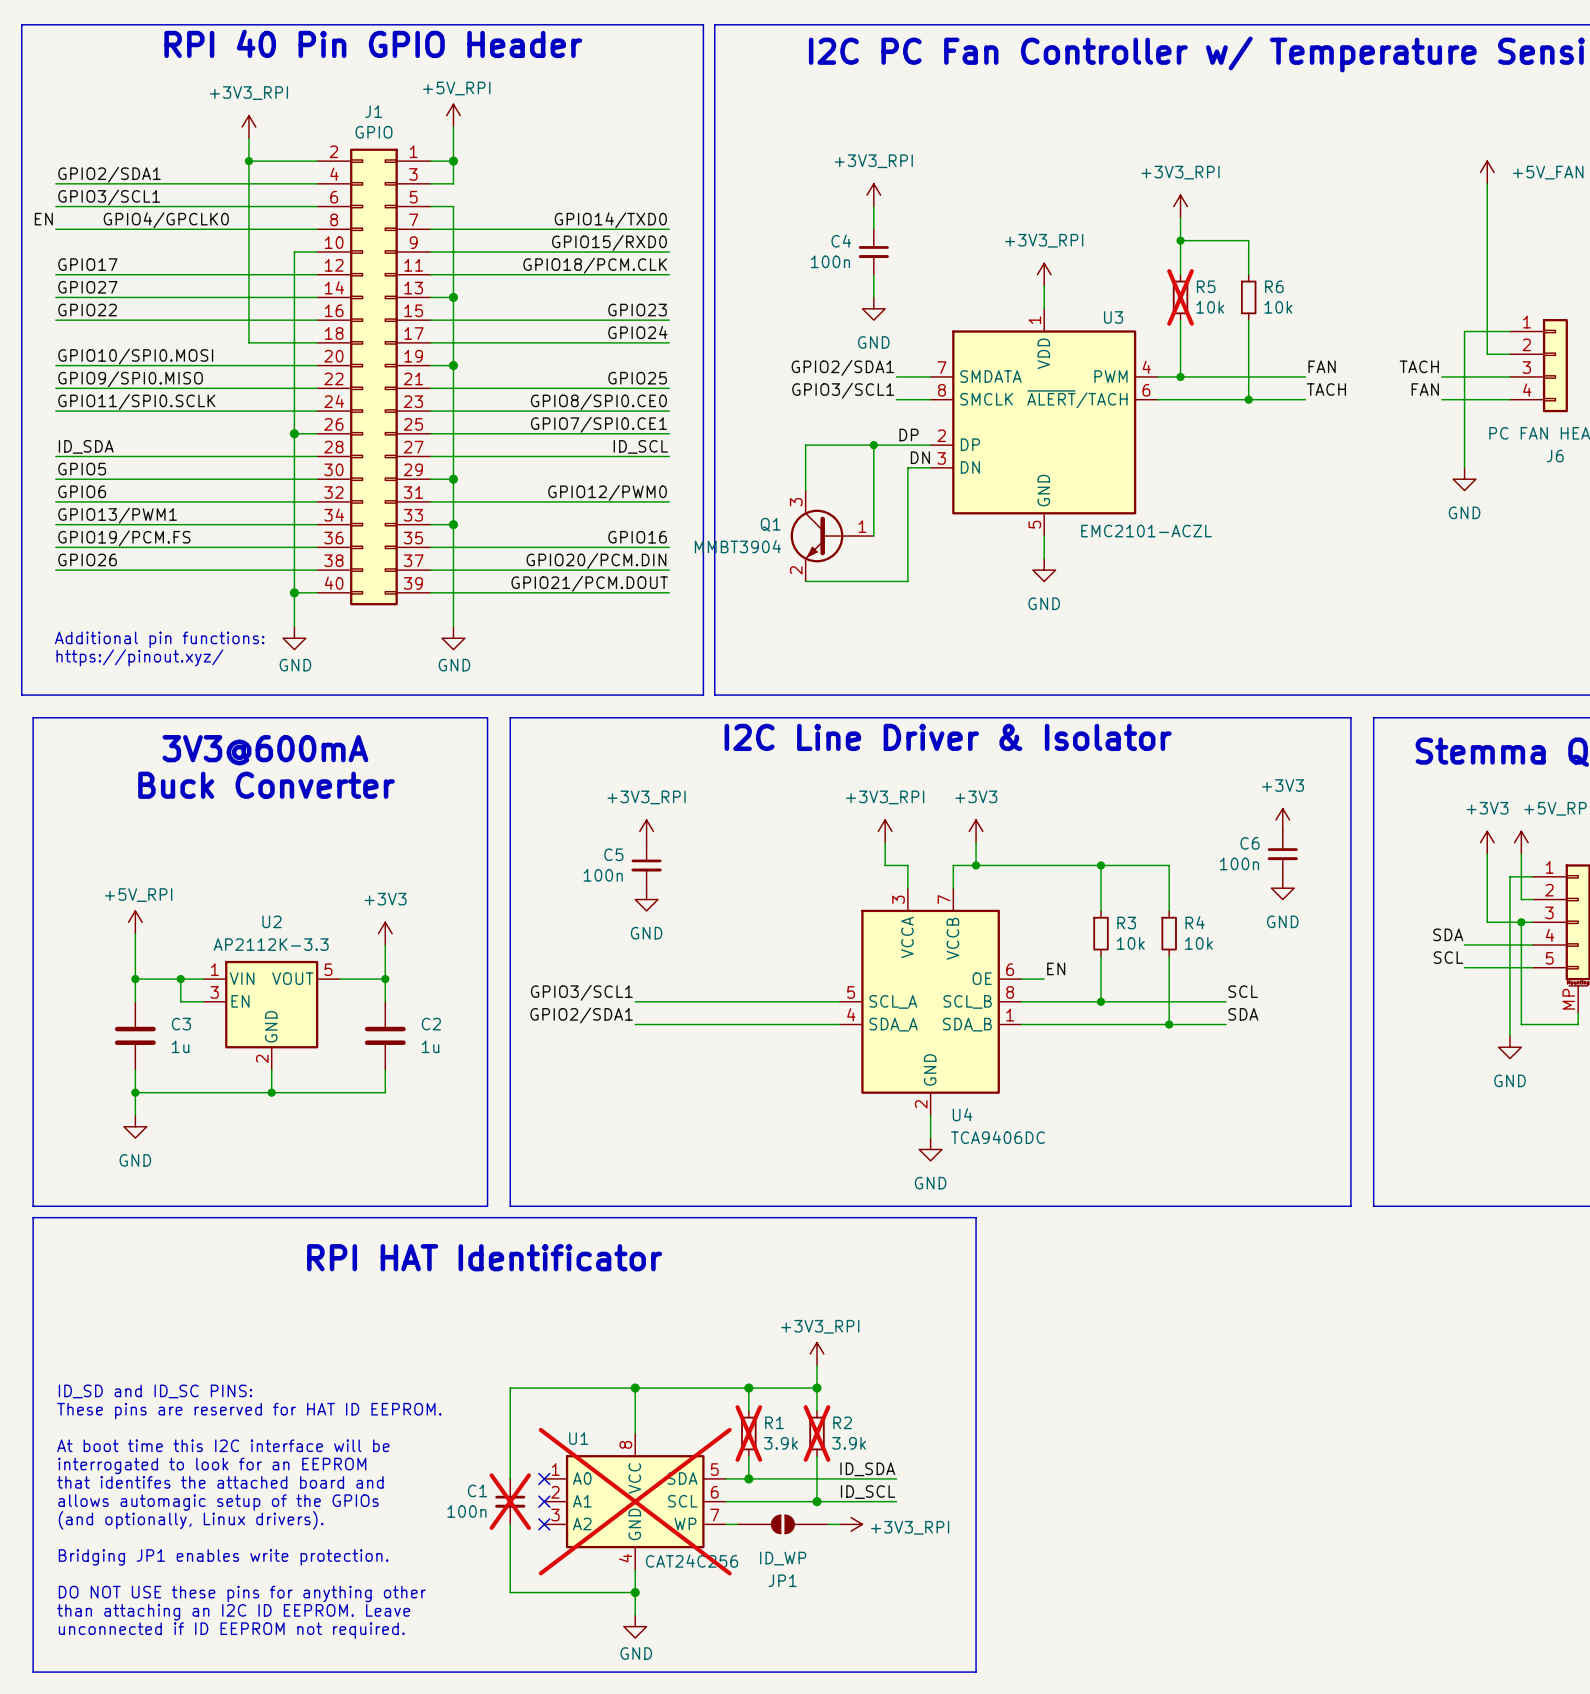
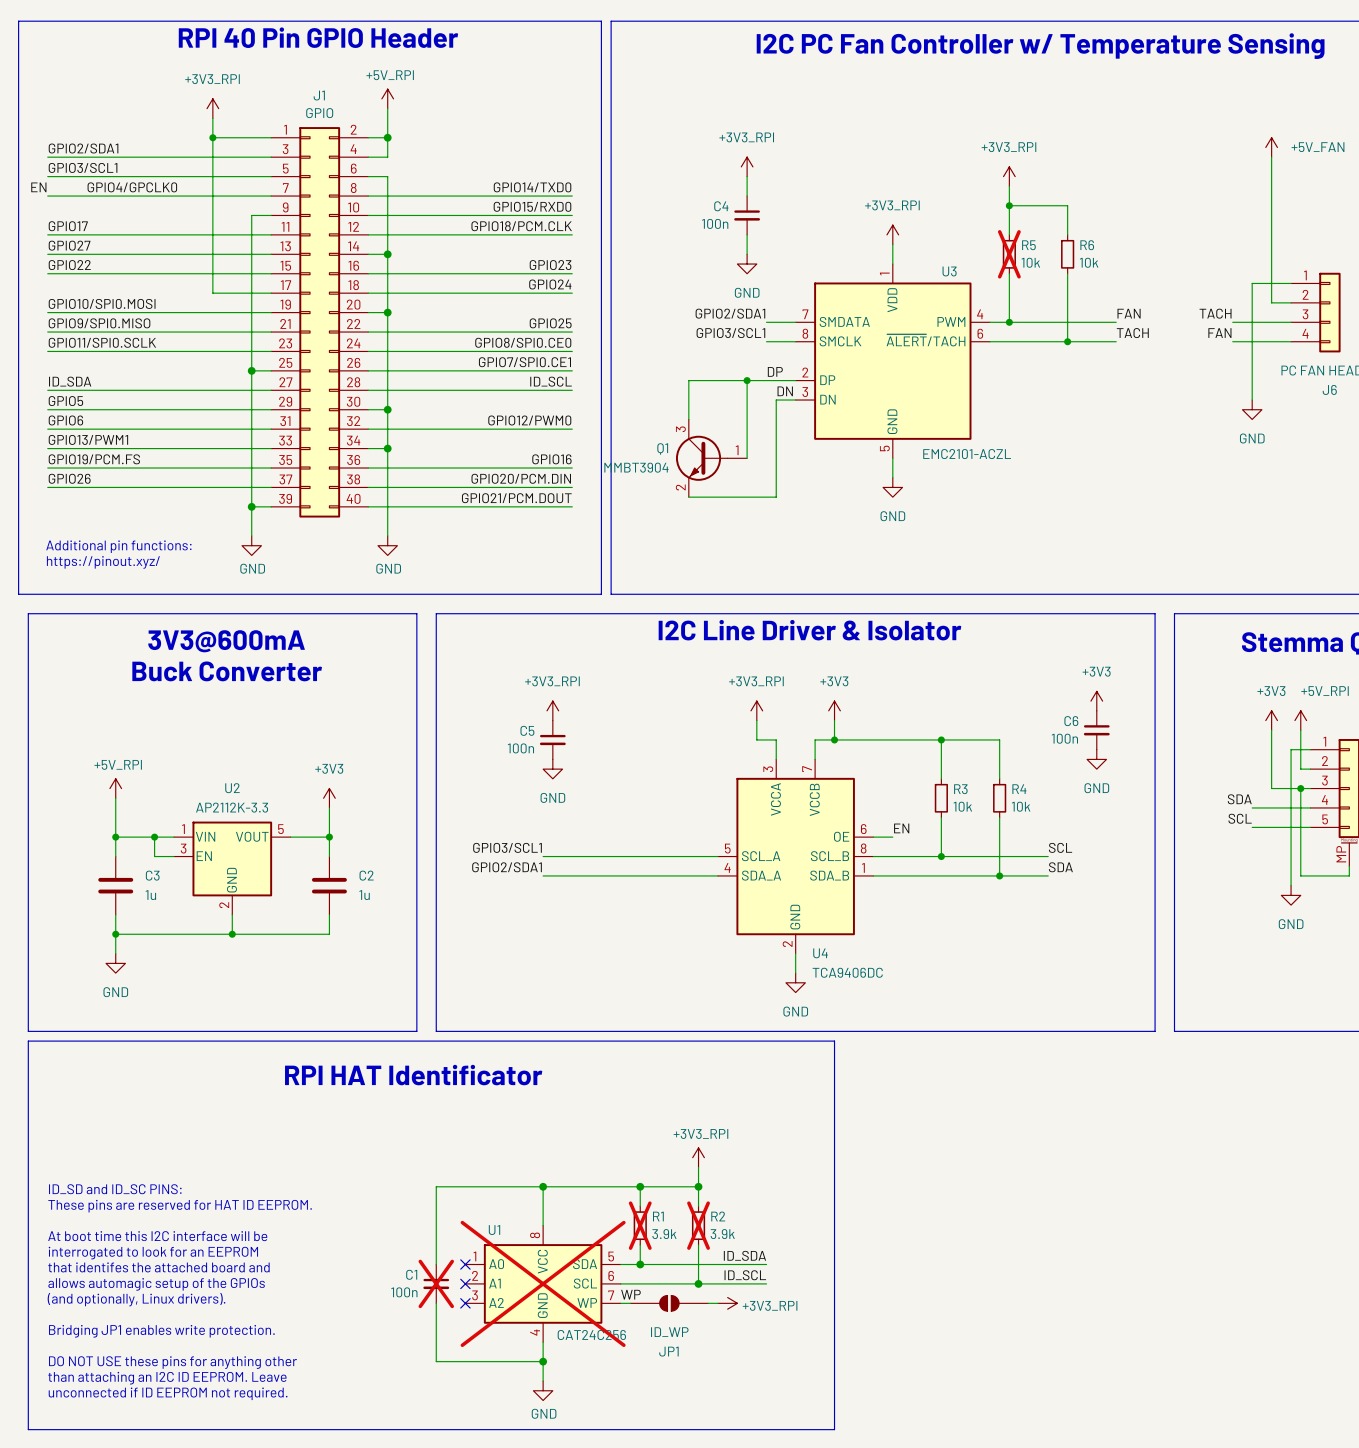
J1 flip: as is (373, 376) -> left-right (319, 322)
label: none -> WP (630, 1294)

